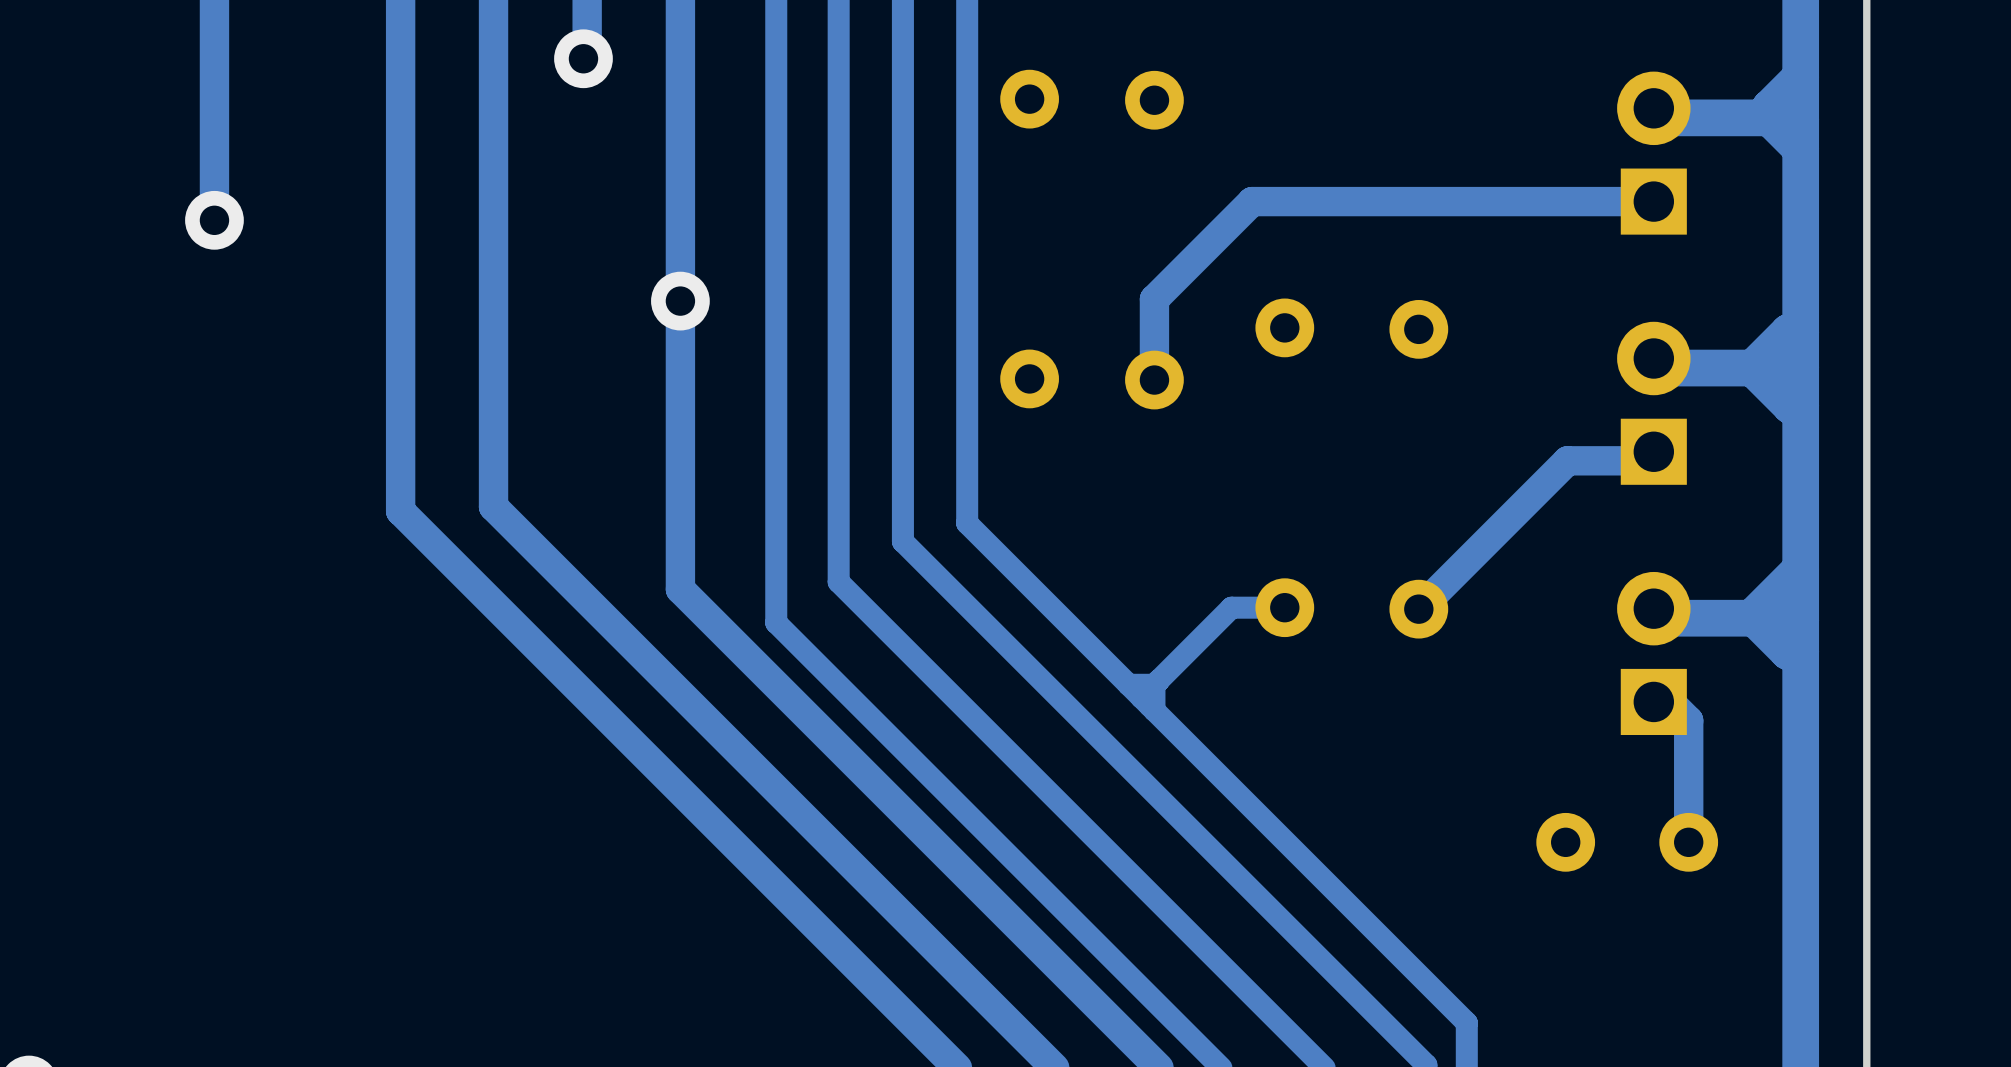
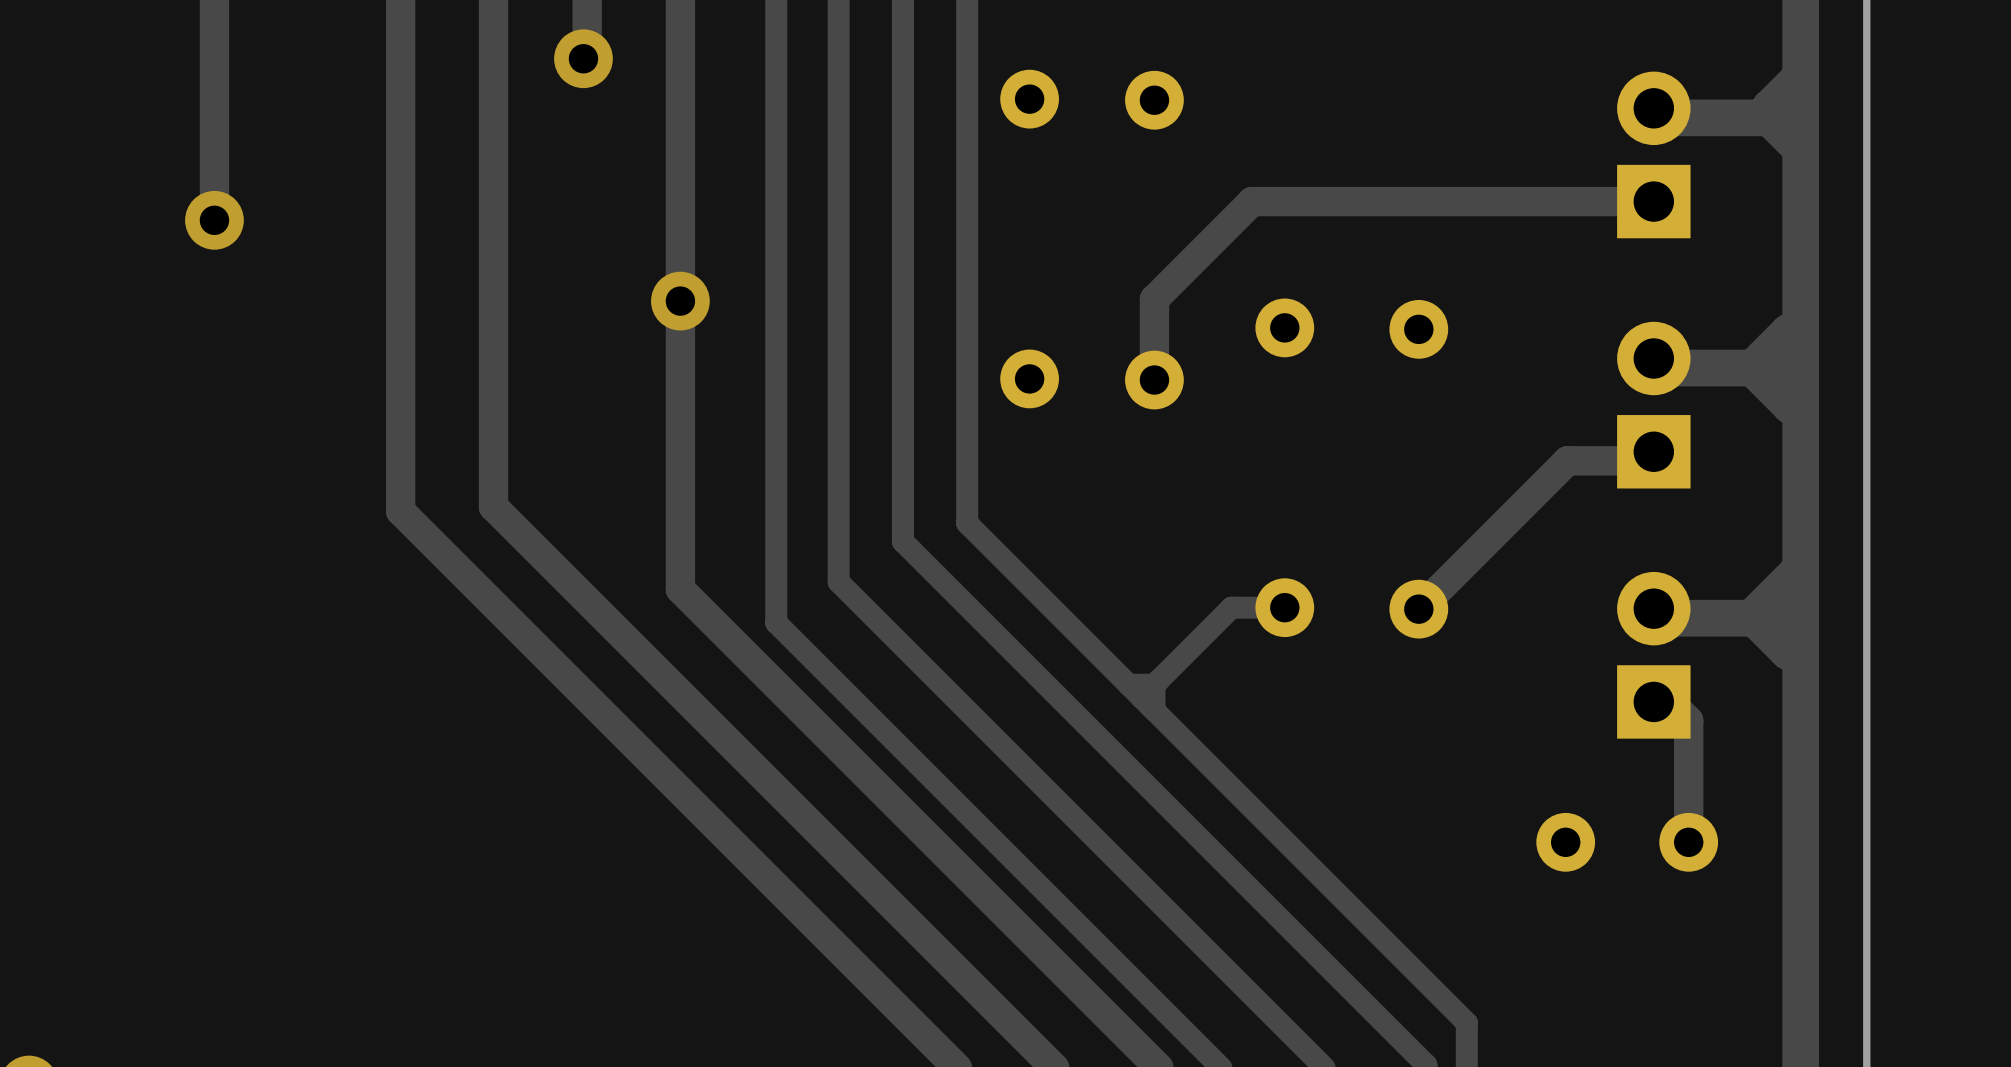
part footprint: [1617, 71, 1691, 235] -> [1617, 71, 1691, 239]
part footprint: [1617, 321, 1691, 485] -> [1617, 321, 1691, 489]
part footprint: [1617, 571, 1691, 735] -> [1617, 571, 1691, 739]

